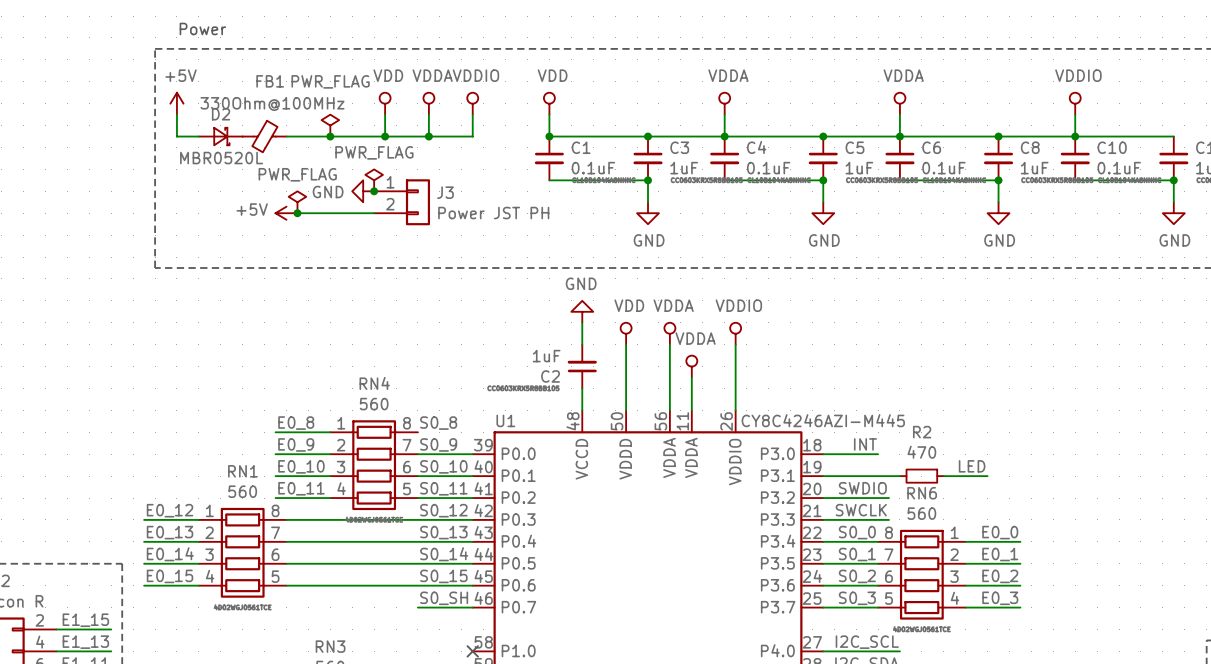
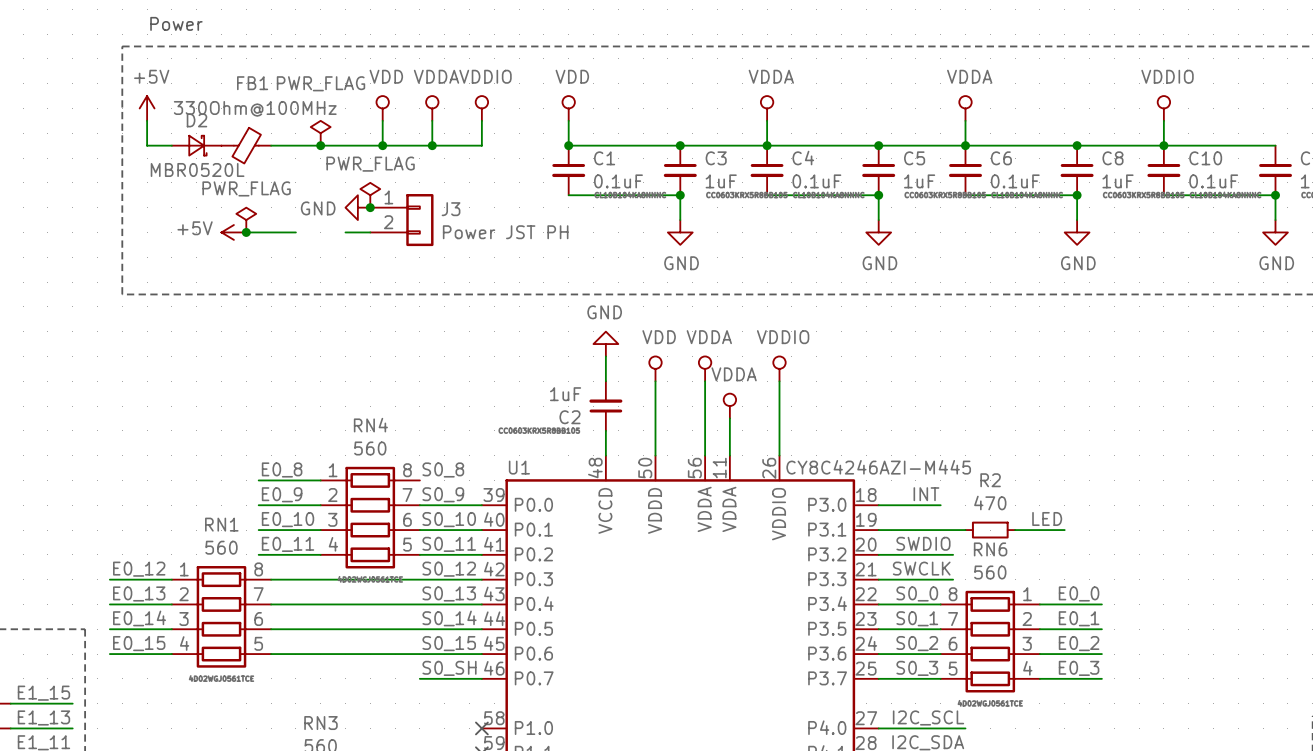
power symbol position: PWR_FLAG (297, 202) -> PWR_FLAG (246, 220)
power symbol position: +5V (286, 213) -> +5V (233, 232)
junction position: (297, 213) -> (246, 232)
wire: (308, 213) (352, 213) -> none

